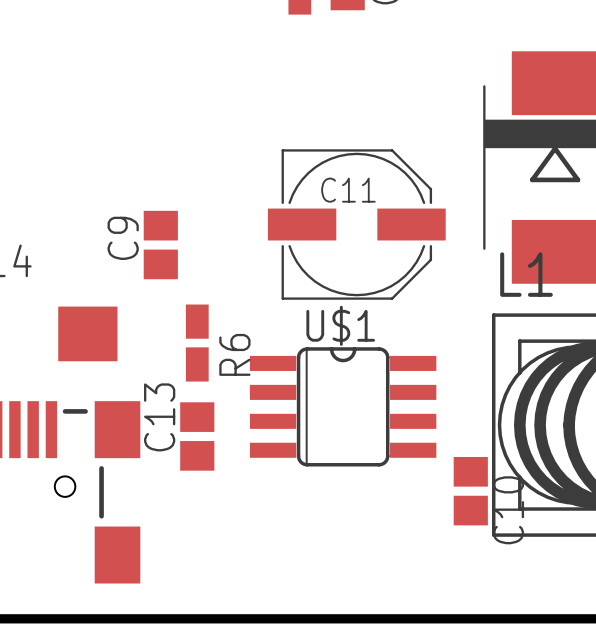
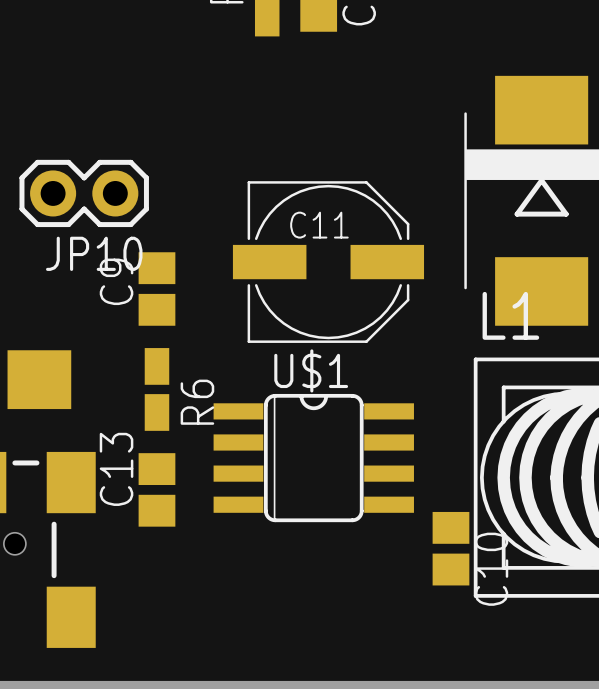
JP10: none -> (84, 193)
C9 position: (160, 245) -> (156, 289)

